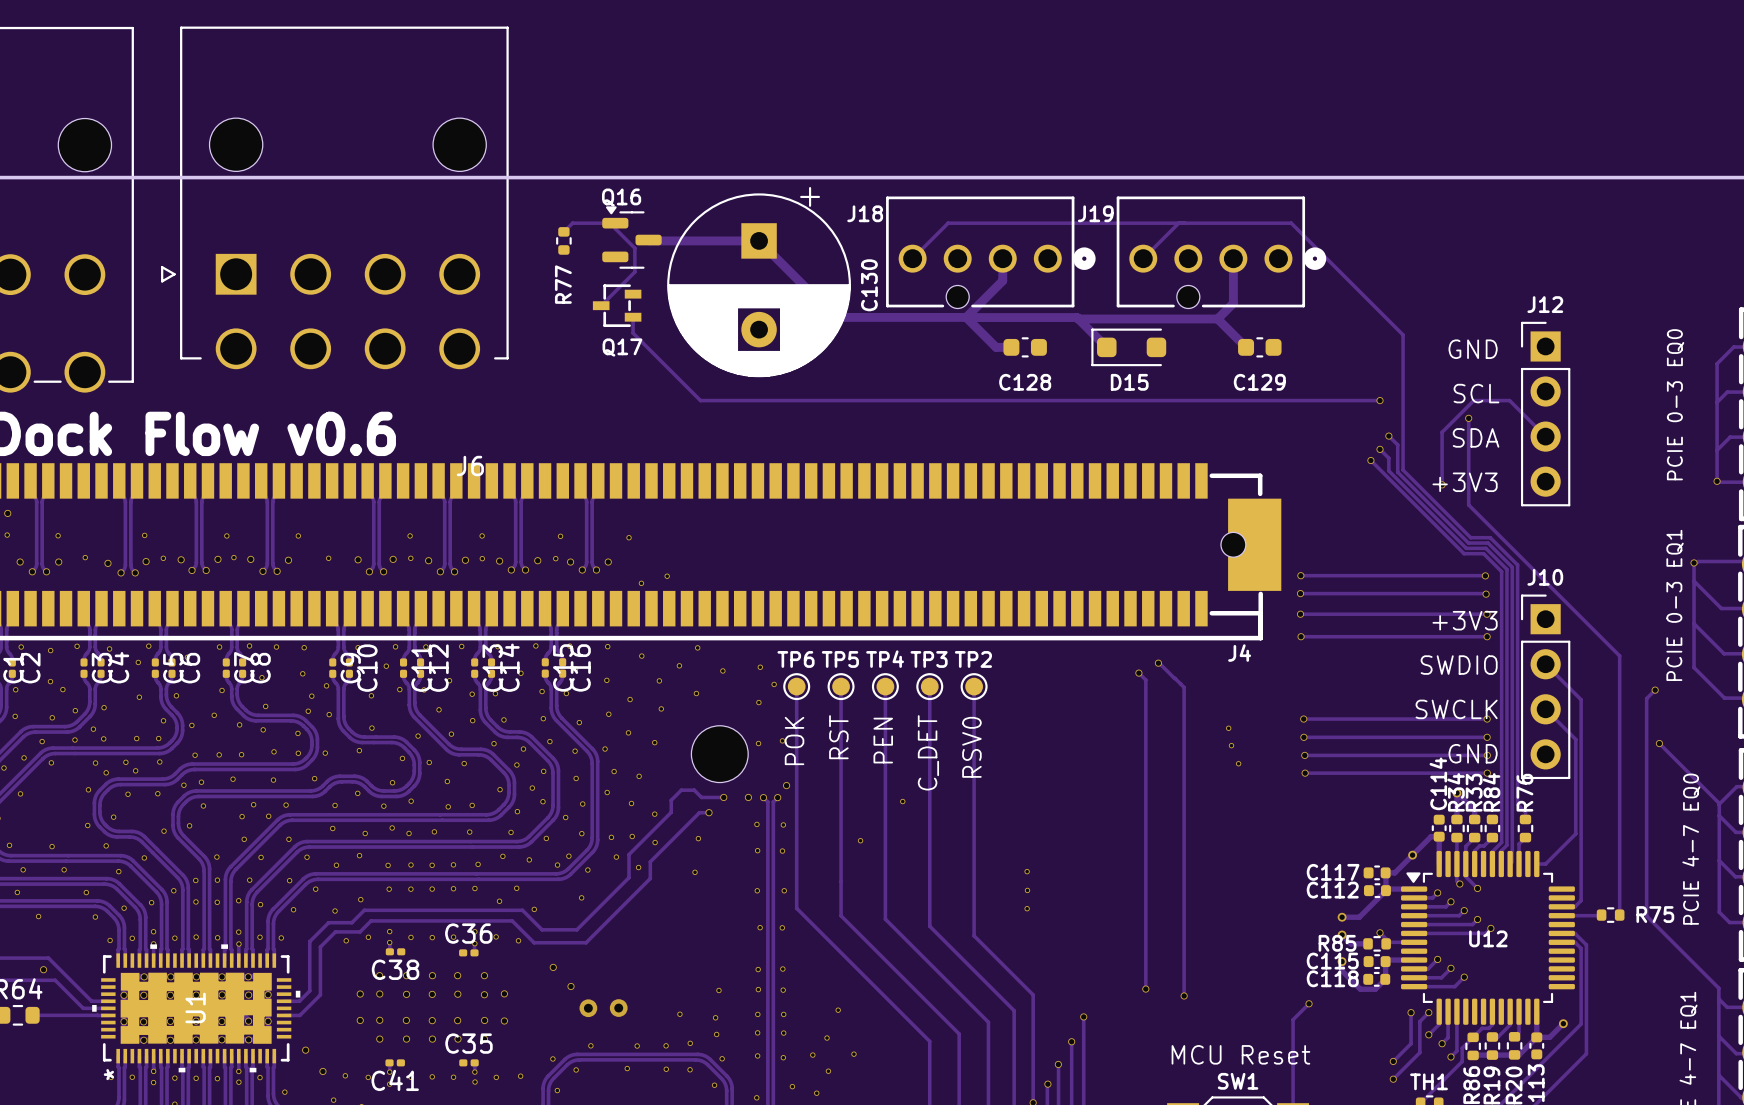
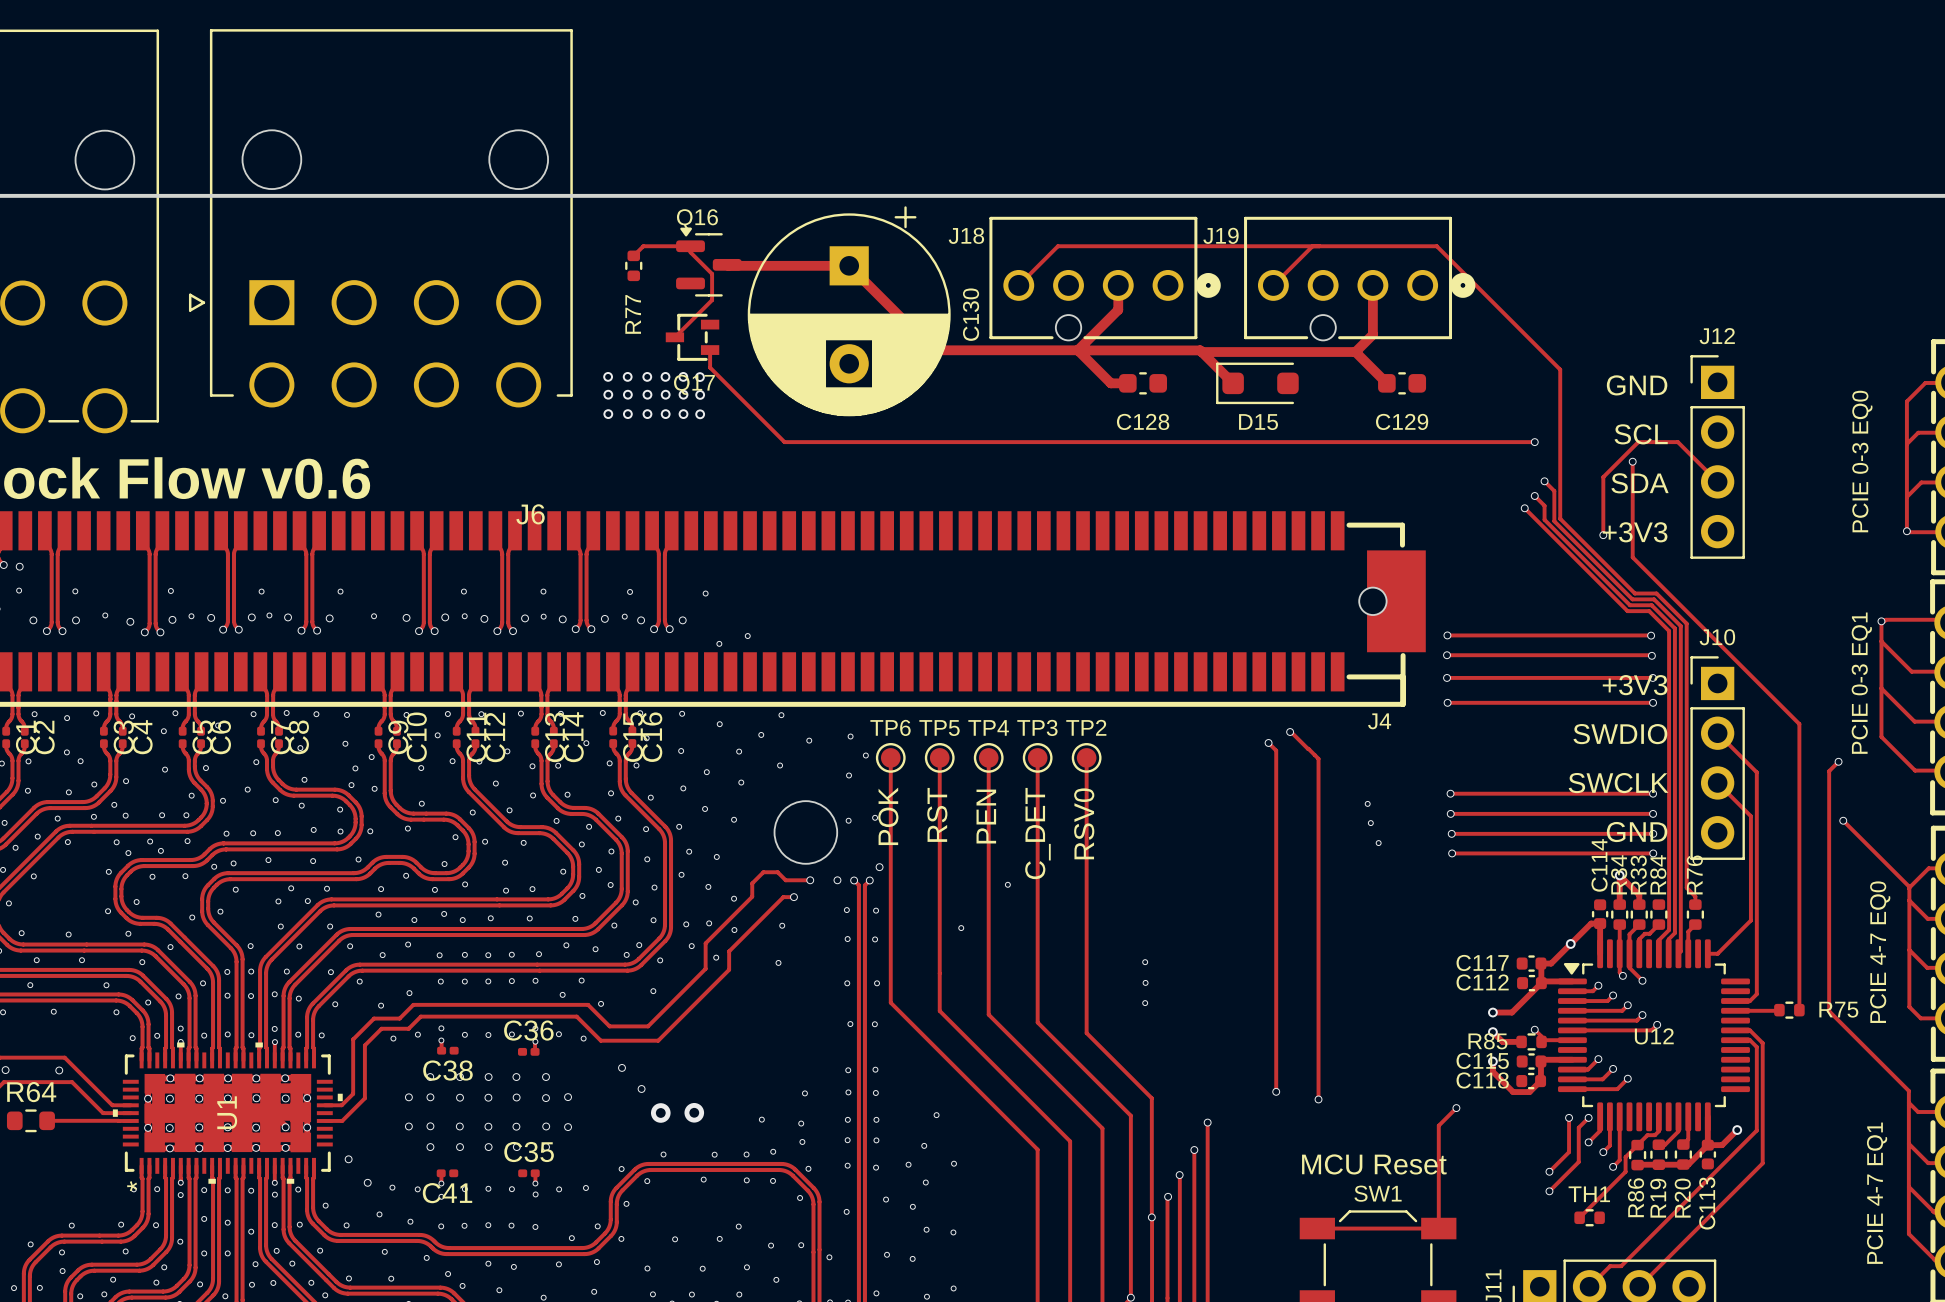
via: none -> (608, 376)
via: none -> (627, 376)
via: none -> (647, 376)
via: none -> (665, 376)
via: none -> (683, 376)
via: none -> (699, 377)
via: none -> (608, 394)
via: none -> (627, 394)
via: none -> (647, 394)
via: none -> (665, 394)
via: none -> (683, 394)
via: none -> (700, 394)
via: none -> (608, 414)
via: none -> (627, 414)
via: none -> (647, 414)
via: none -> (665, 414)
via: none -> (683, 414)
via: none -> (700, 414)

